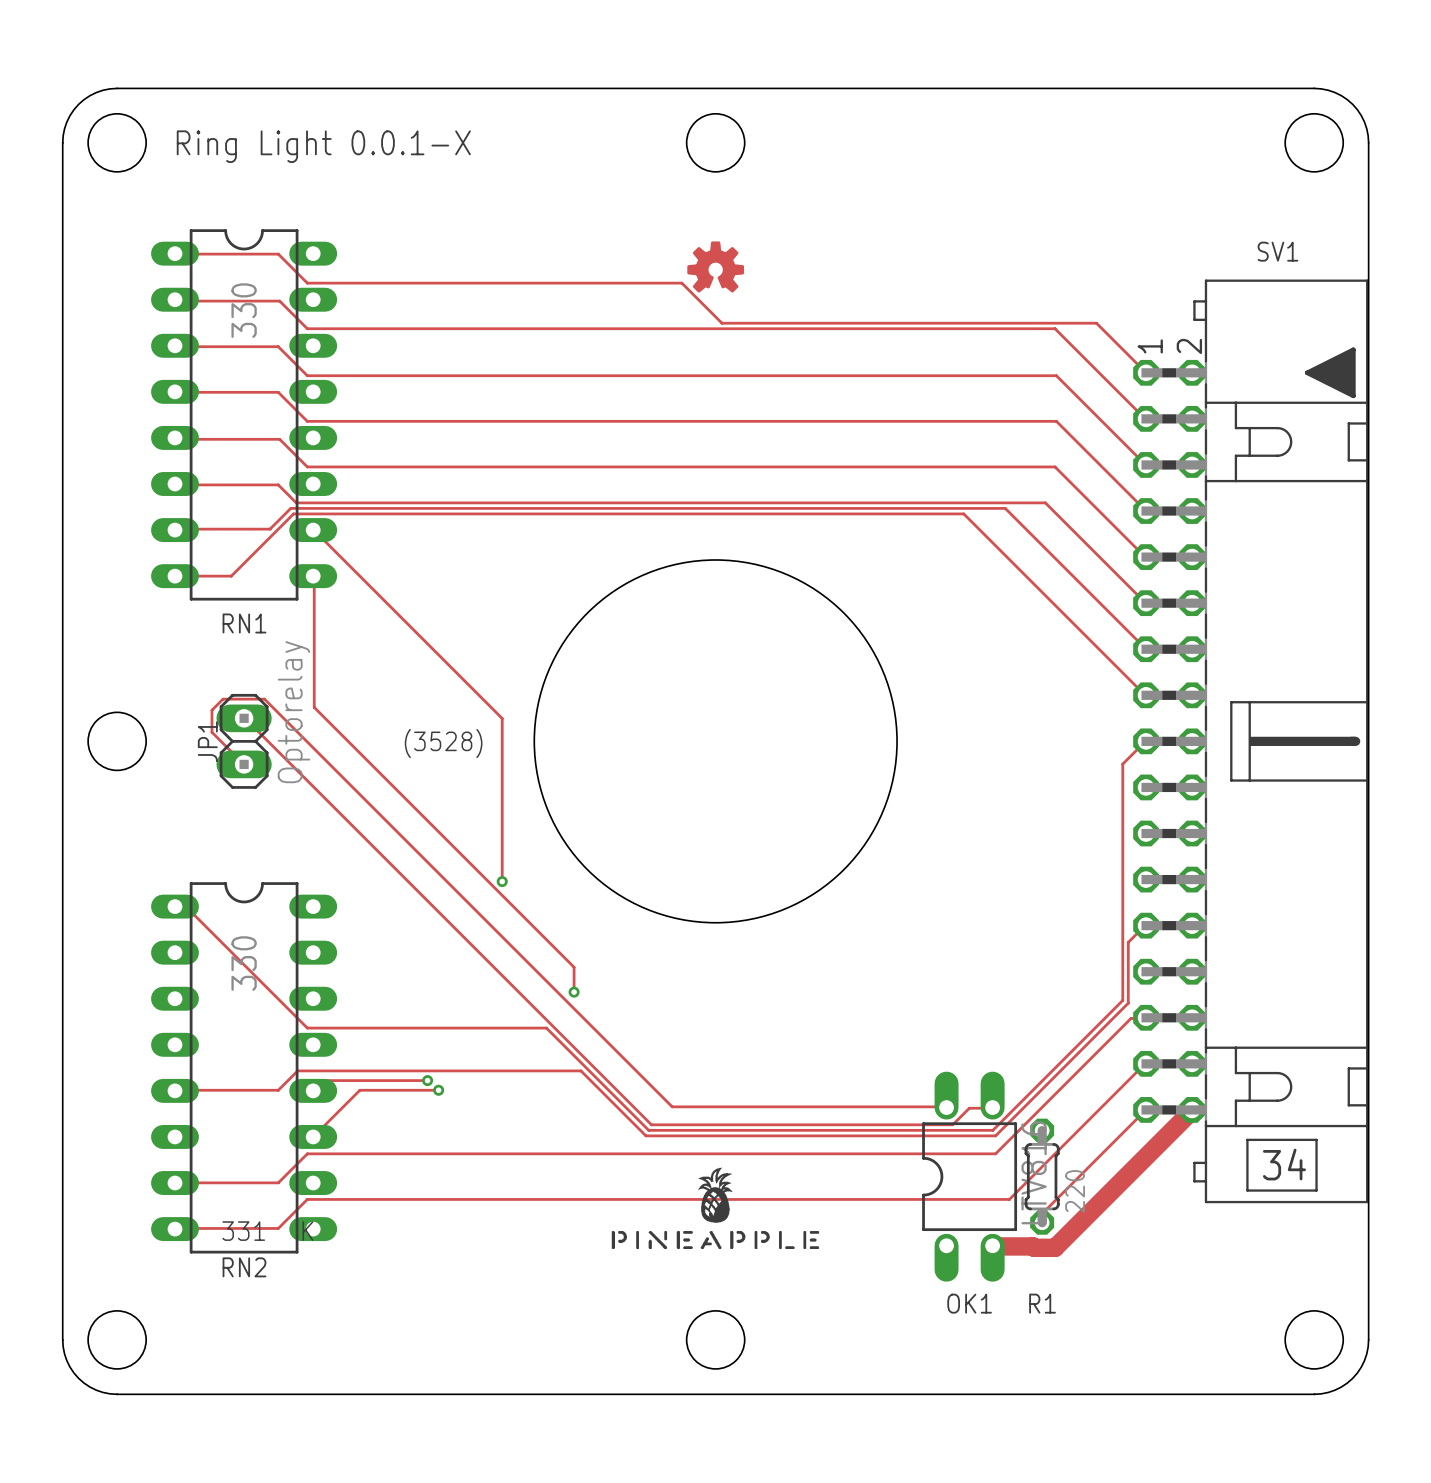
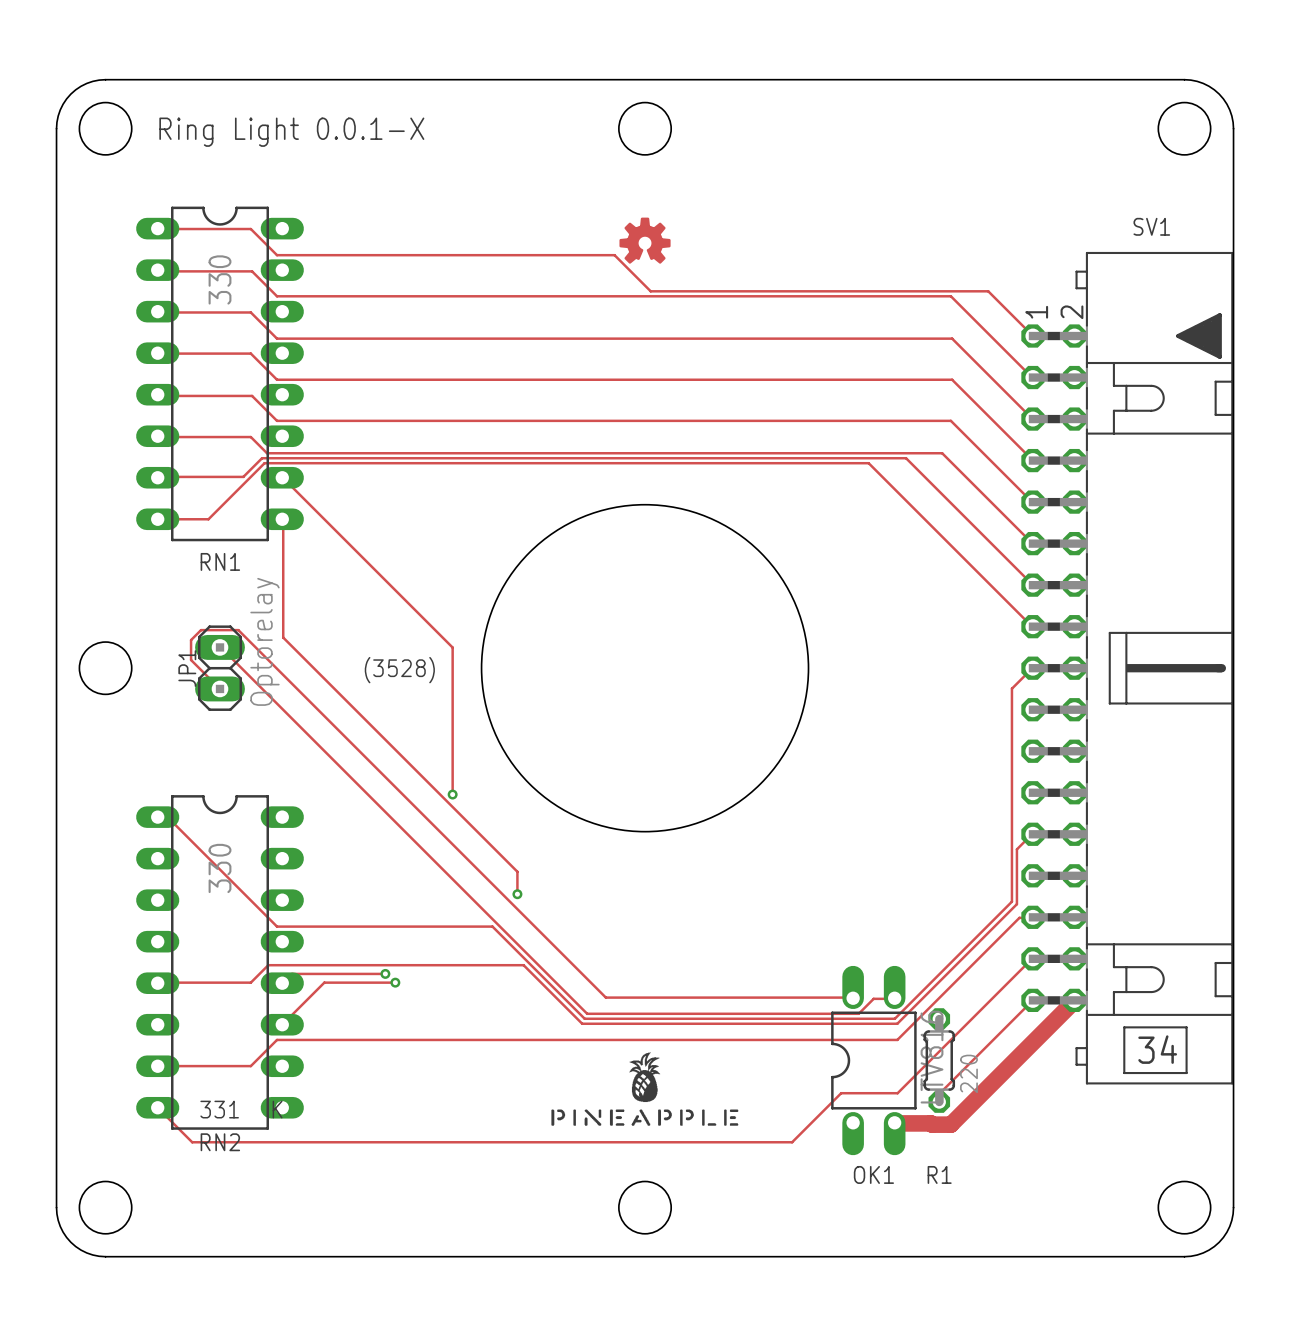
track: (1009, 1199) (307, 1199) (278, 1228) (174, 1229) -> (909, 1081) (897, 1093) (841, 1093) (792, 1142) (192, 1142) (157, 1107)

